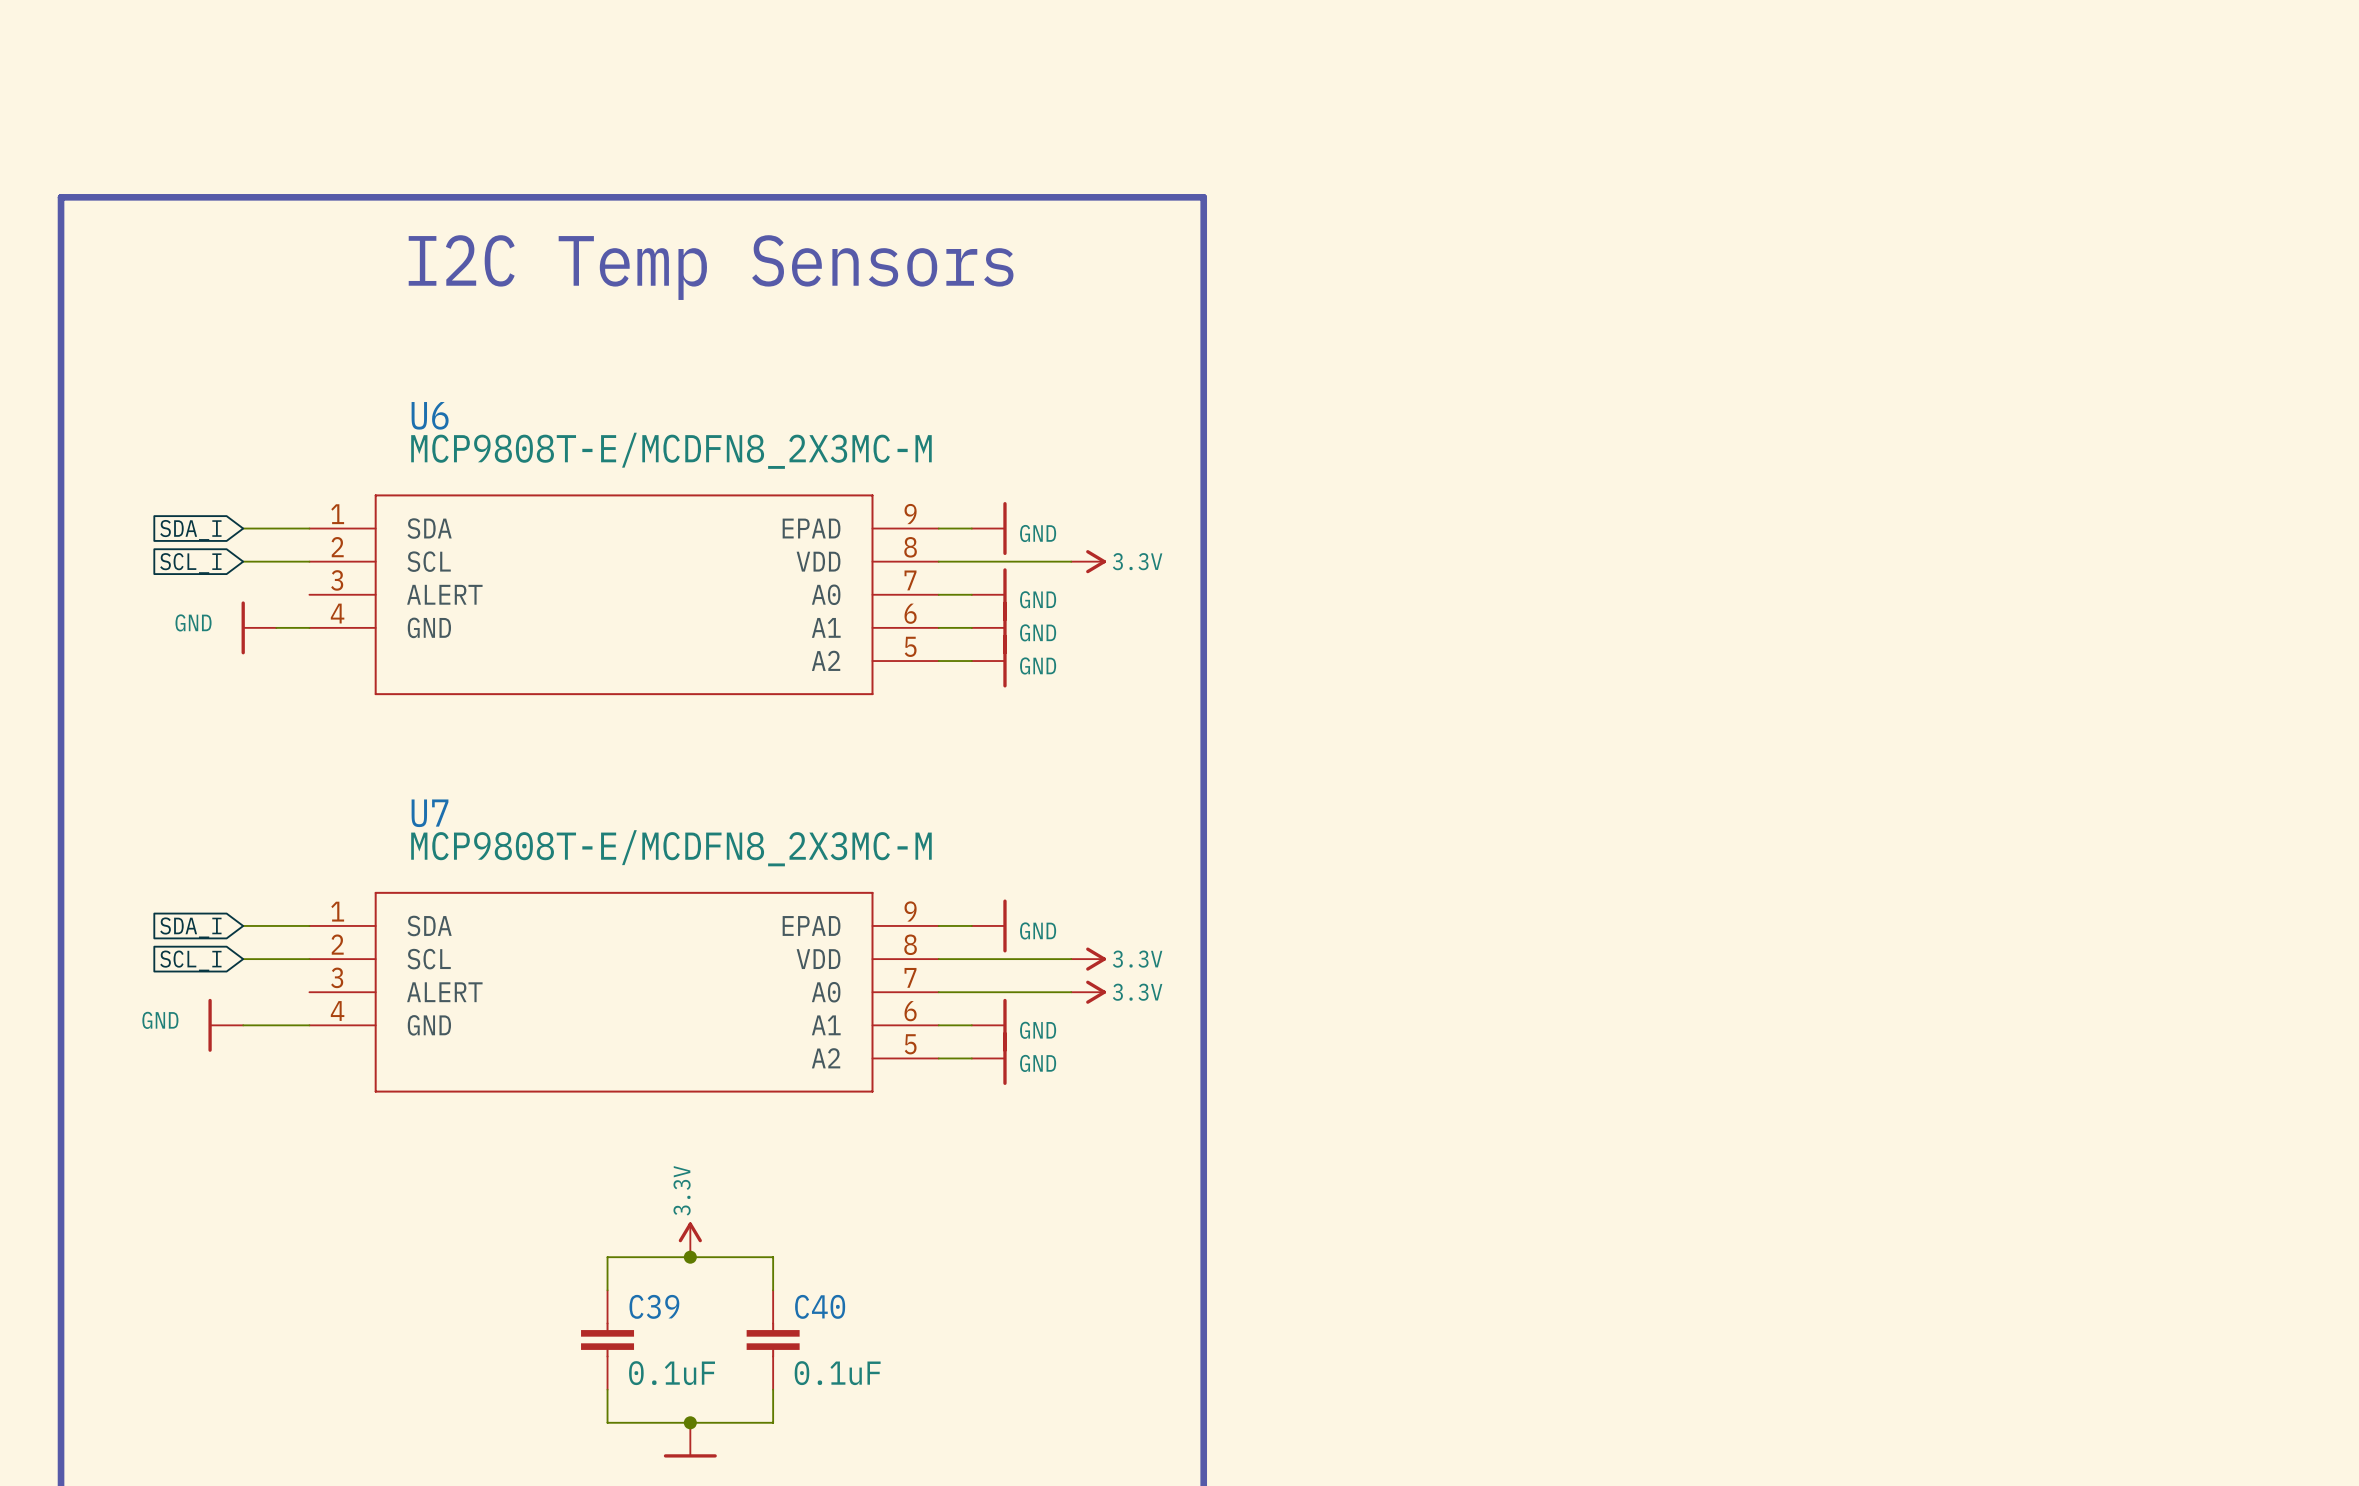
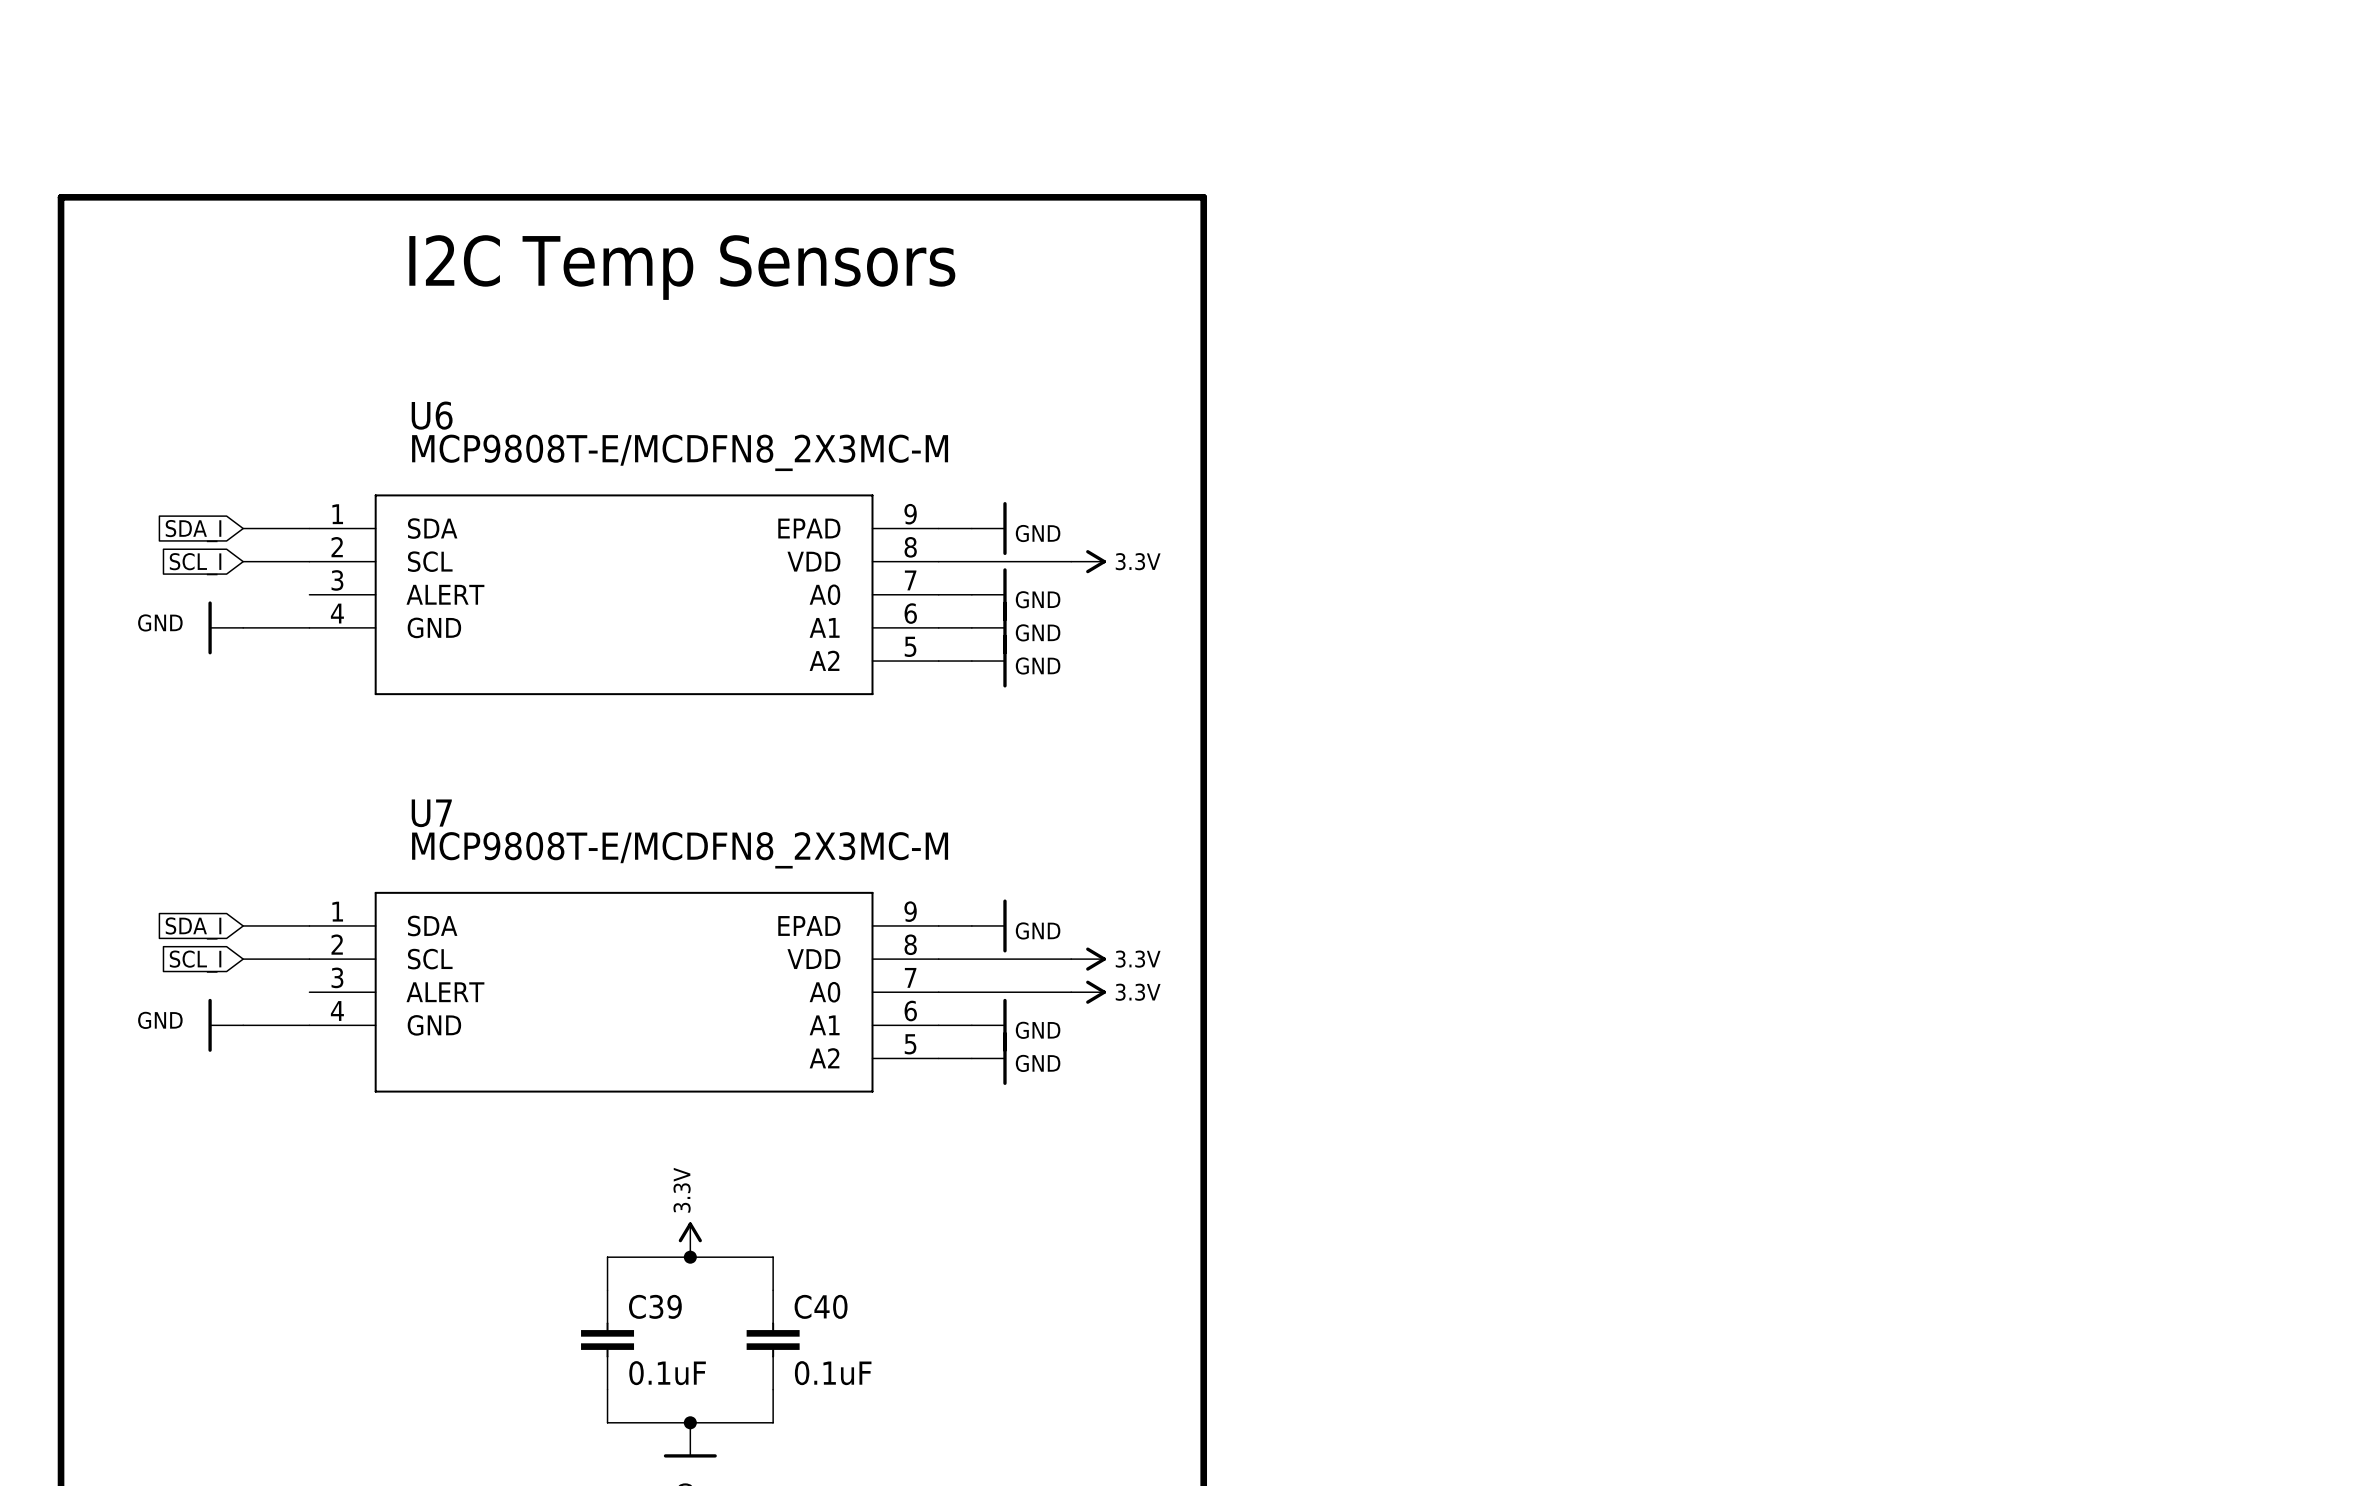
power symbol position: GND (258, 627) -> GND (225, 627)

